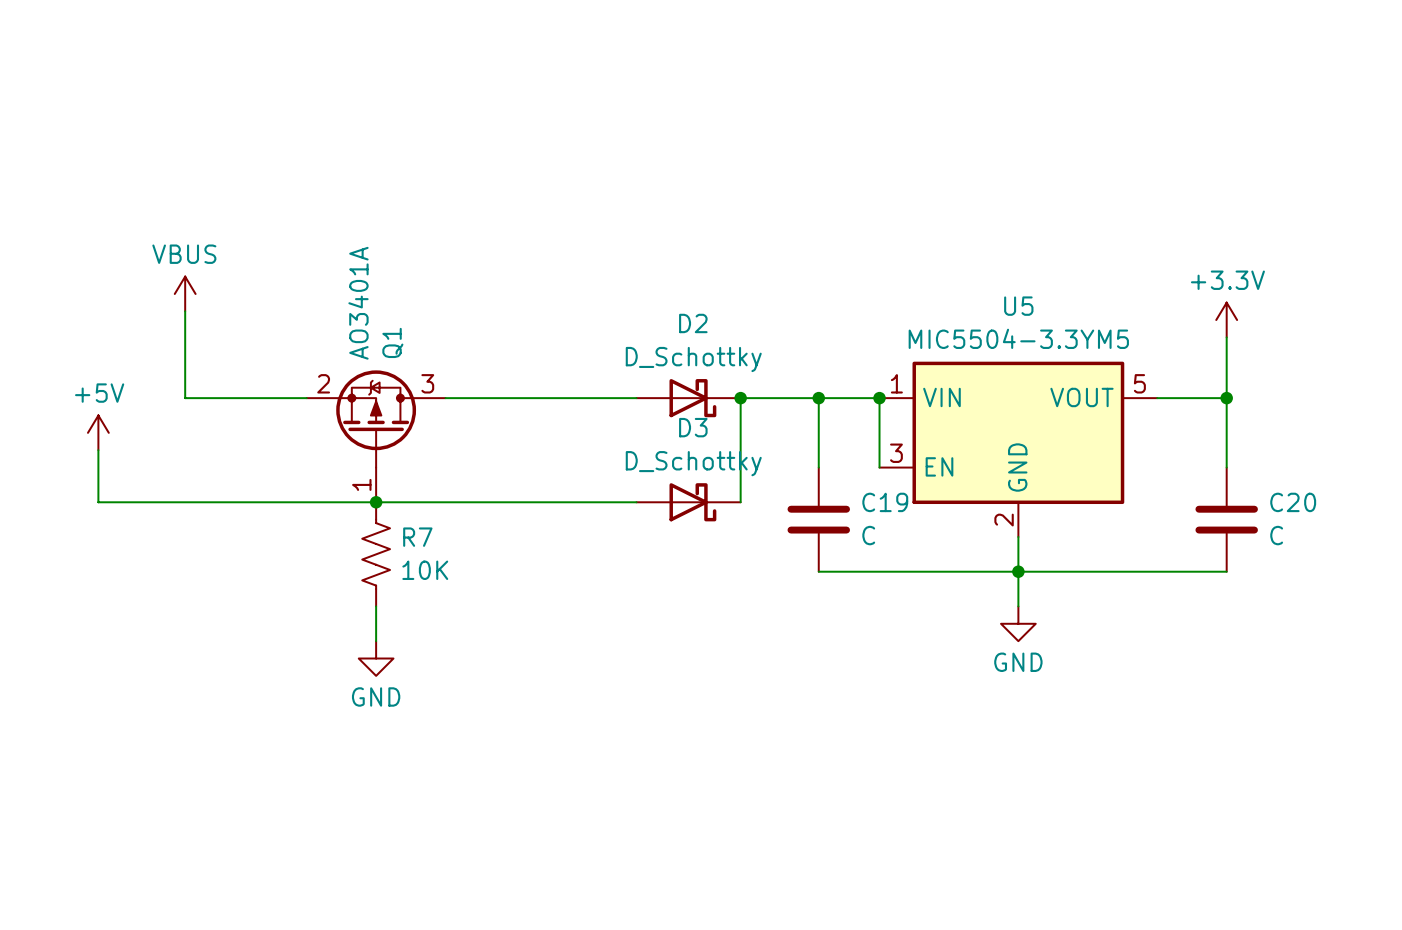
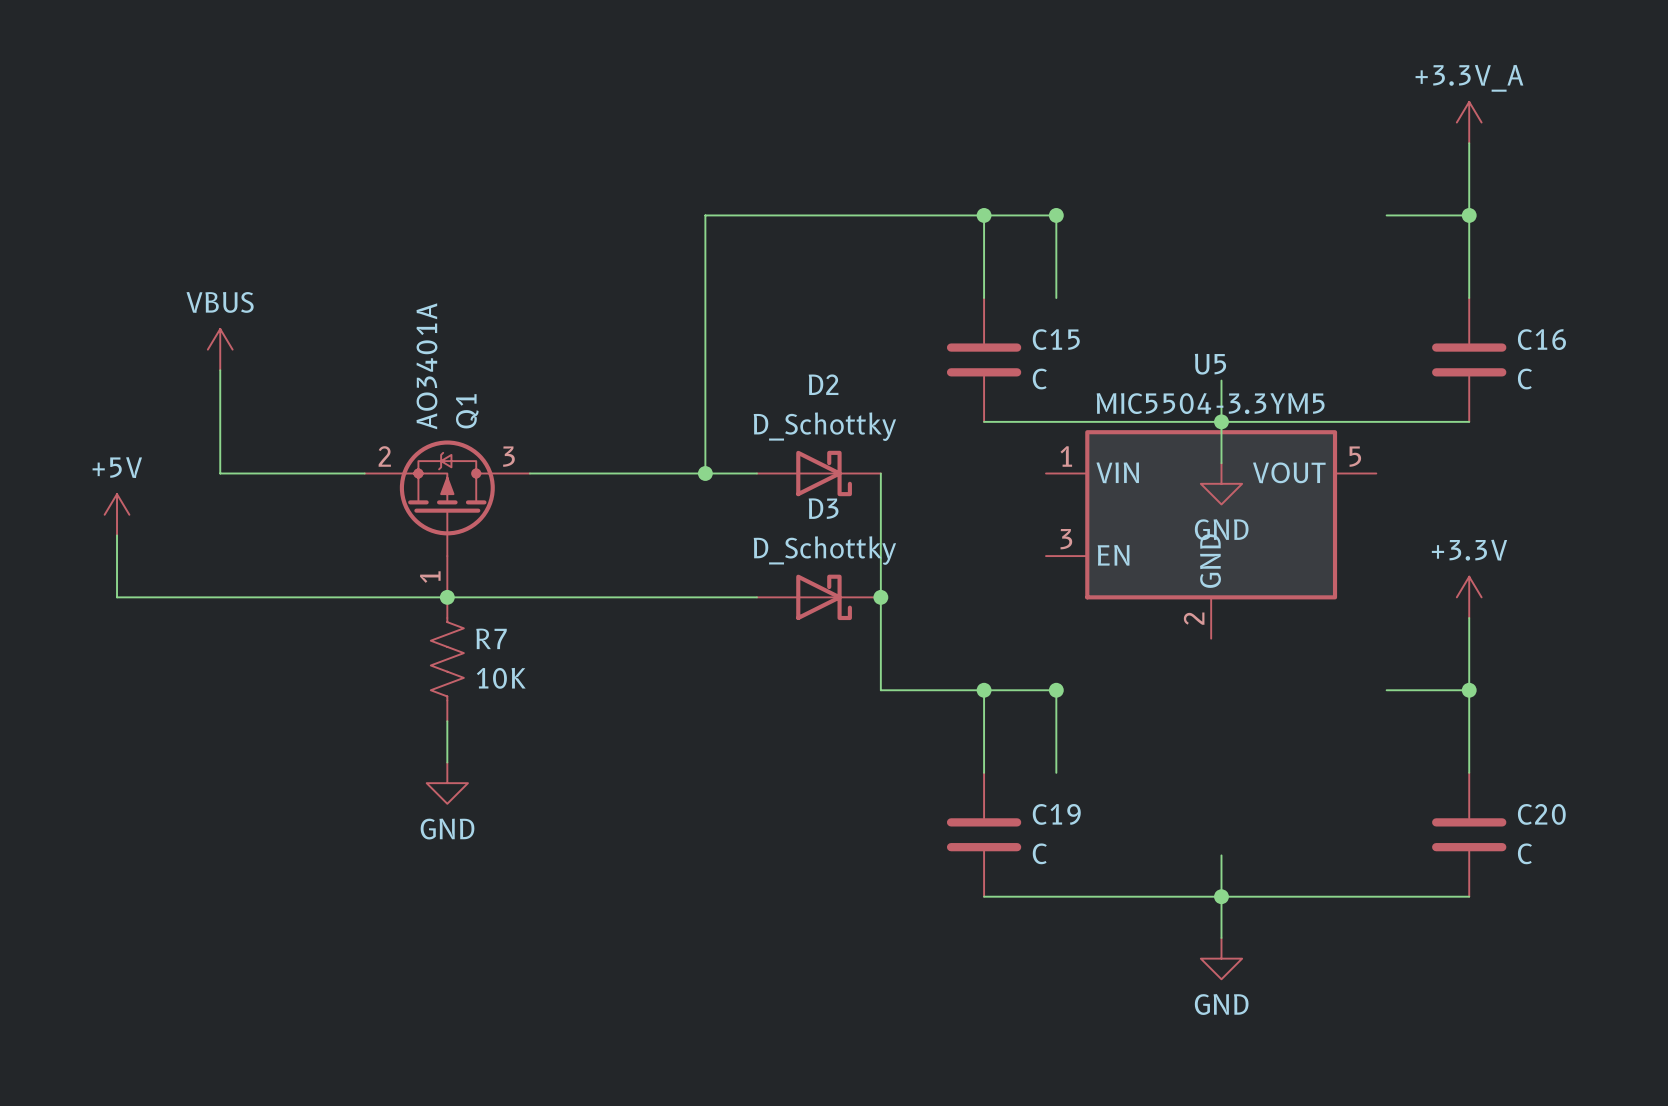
power symbol: none -> +3.3V_A (1469, 122)
wire: none -> (1469, 143) (1469, 298)
wire: none -> (984, 215) (984, 298)
junction: none -> (984, 215)
junction: none -> (1056, 215)
wire: none -> (1386, 215) (1469, 215)
junction: none -> (1469, 215)
wire: none -> (1056, 298) (1056, 215) (705, 215) (705, 473)
C15: none -> C (984, 359)
C16: none -> C (1469, 359)
wire: none -> (1221, 380) (1221, 463)
power symbol position: +3.3V (1226, 320) -> +3.3V (1469, 597)
wire: (1226, 337) (1226, 467) -> (1469, 618) (1469, 772)
wire: none -> (984, 421) (1469, 421)
junction: none -> (1221, 421)
junction: none -> (705, 473)
wire: (740, 398) (879, 398) (879, 467) -> none
junction: (740, 398) -> none
wire: (818, 398) (818, 467) -> (984, 690) (984, 772)
junction: (818, 398) -> none
junction: (879, 398) -> none
wire: (1157, 398) (1226, 398) -> (1386, 690) (1469, 690)
junction: (1226, 398) -> none
power symbol: none -> GND (1221, 483)
wire: none -> (880, 597) (880, 690) (1056, 690) (1056, 772)
junction: none -> (880, 597)
C19 position: (818, 519) -> (984, 834)
C20 position: (1226, 519) -> (1469, 834)
wire: (1018, 536) (1018, 606) -> (1221, 855) (1221, 937)
wire: (818, 571) (1226, 571) -> (984, 896) (1469, 896)
junction: (1018, 571) -> none
junction: none -> (984, 690)
junction: none -> (1056, 690)
junction: none -> (1469, 690)
power symbol: GND (1018, 623) -> none
junction: none -> (1221, 896)
power symbol: none -> GND (1221, 958)

